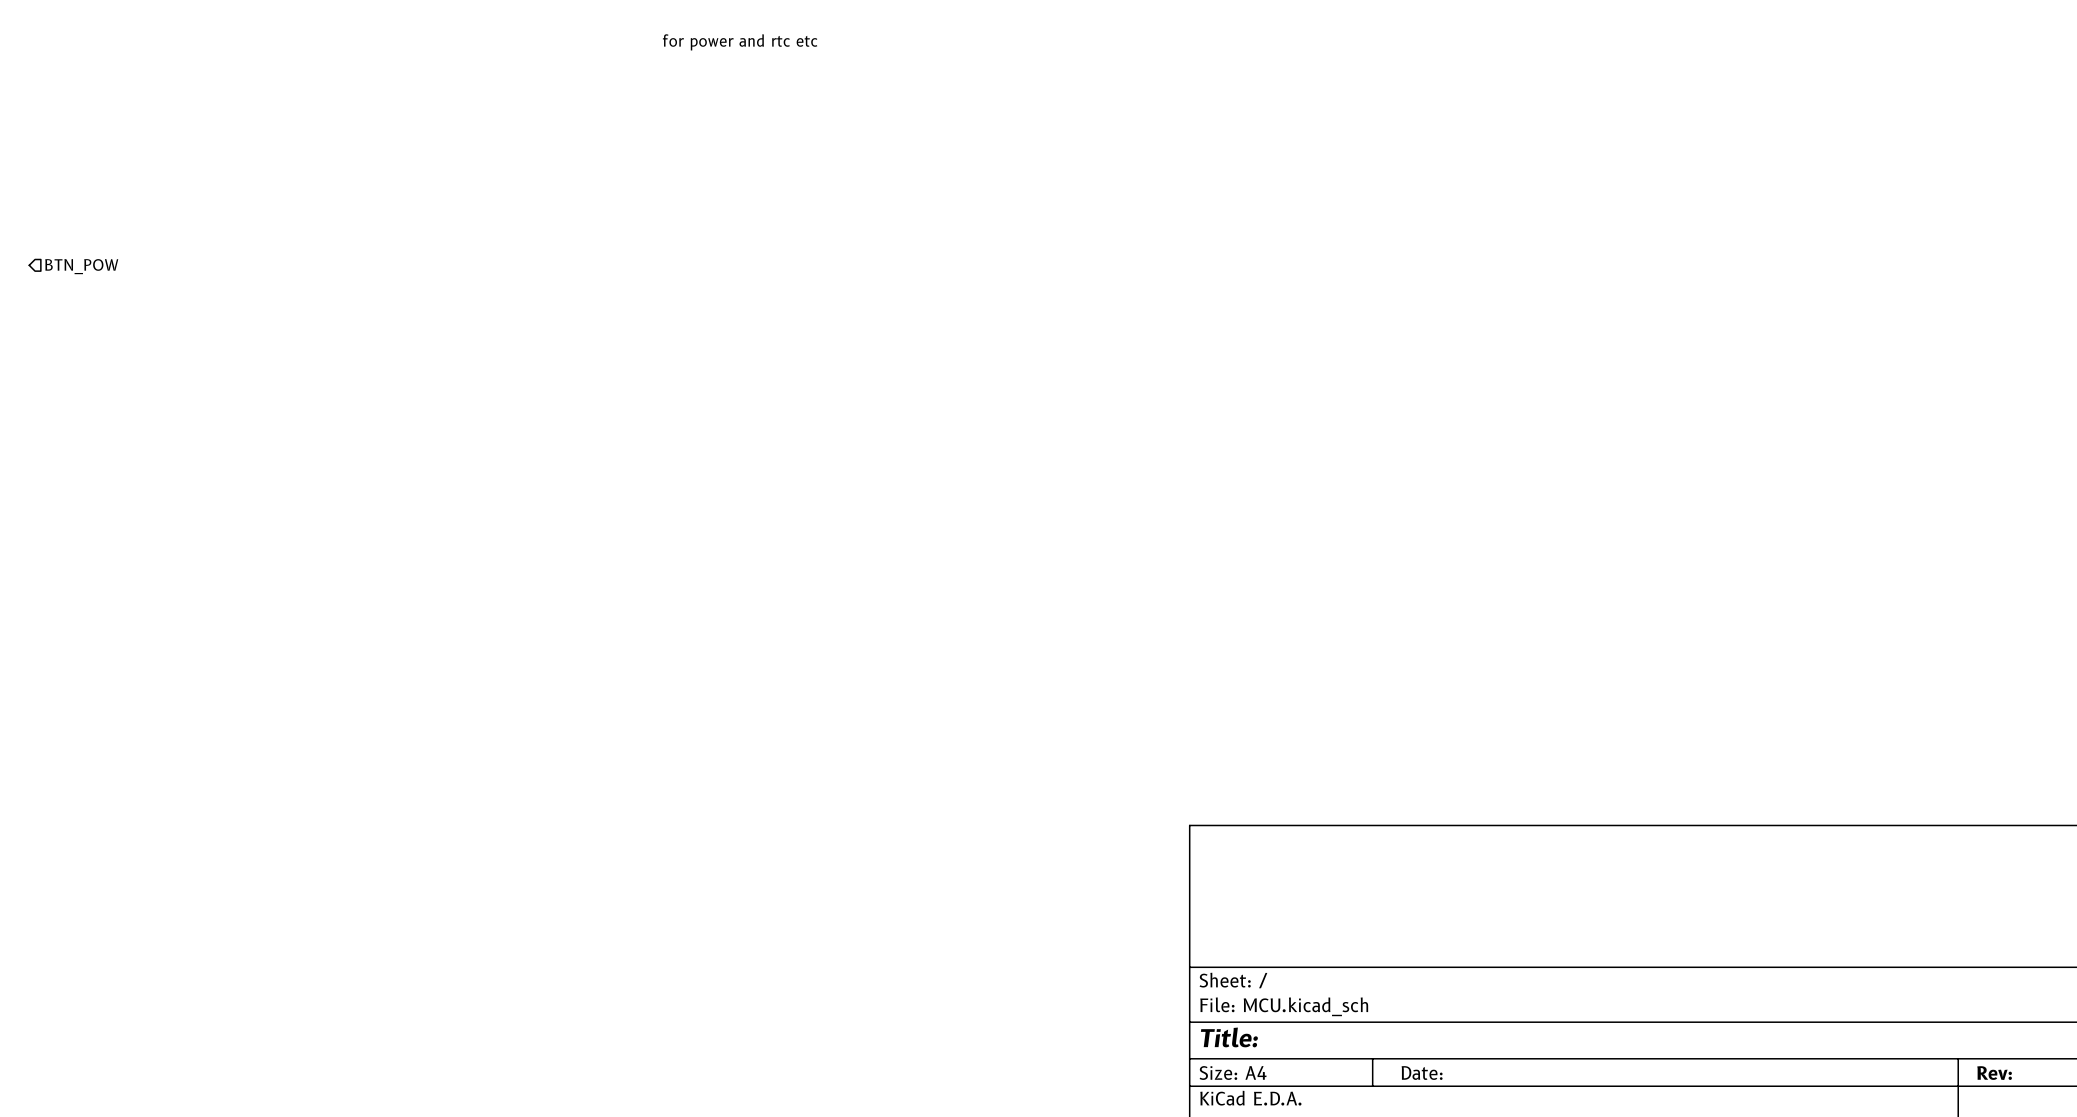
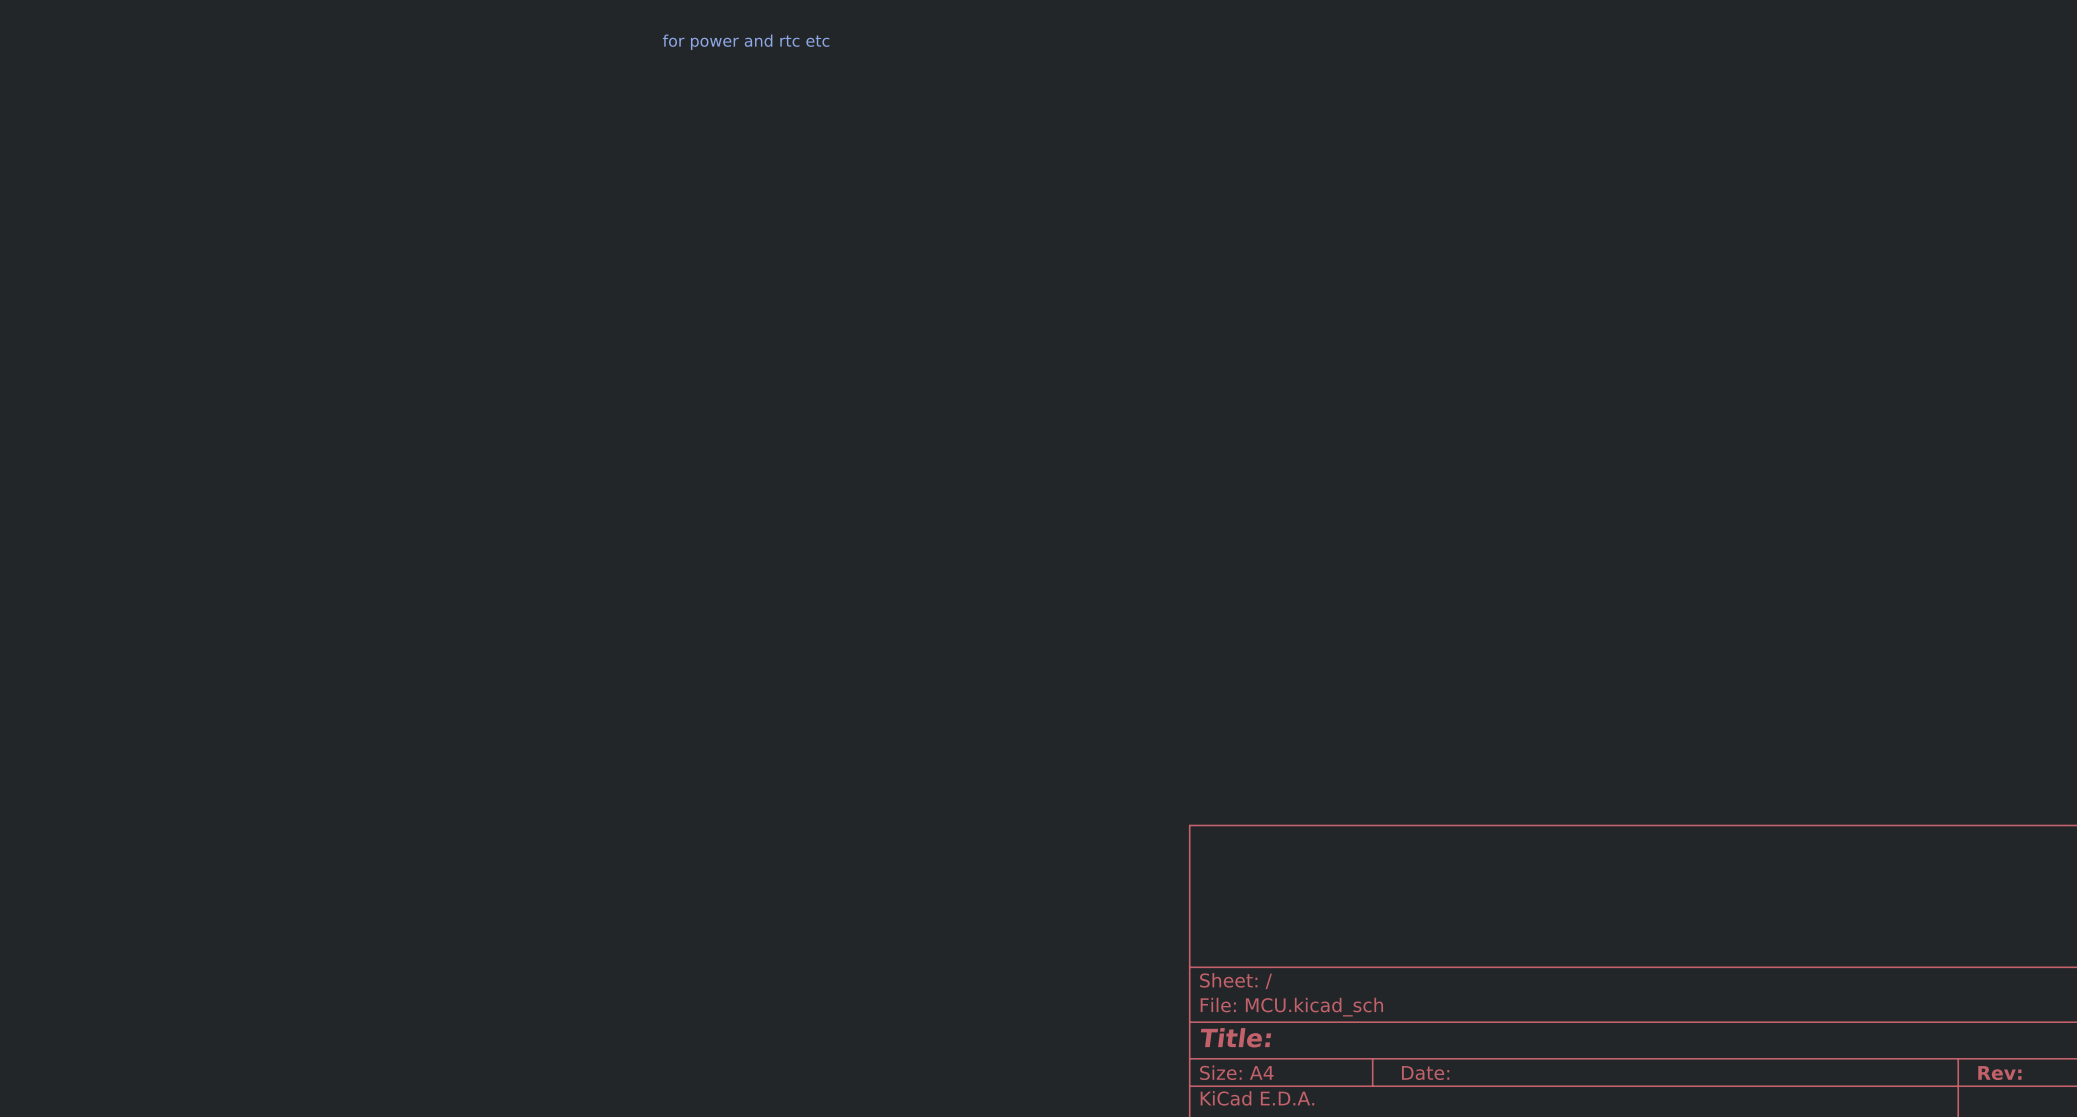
hierarchical label: BTN_POW (81, 266) -> none

